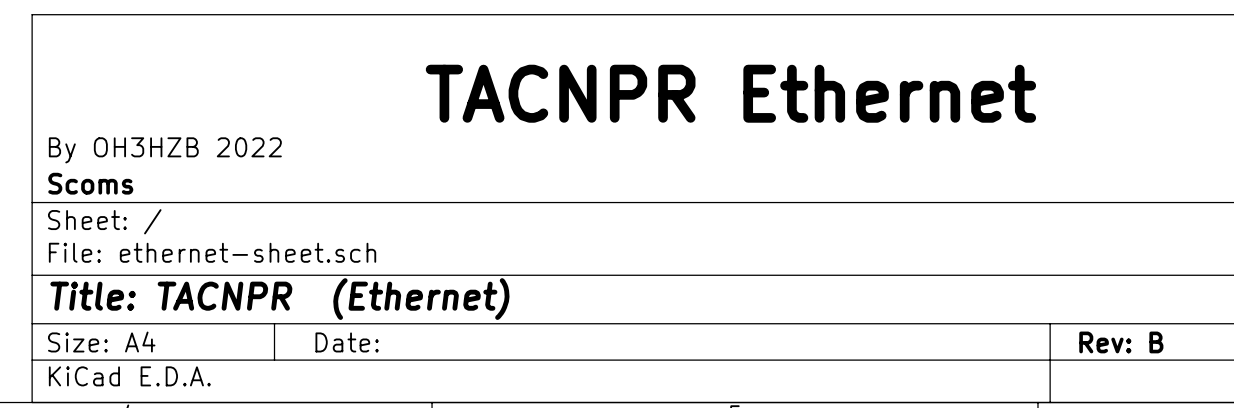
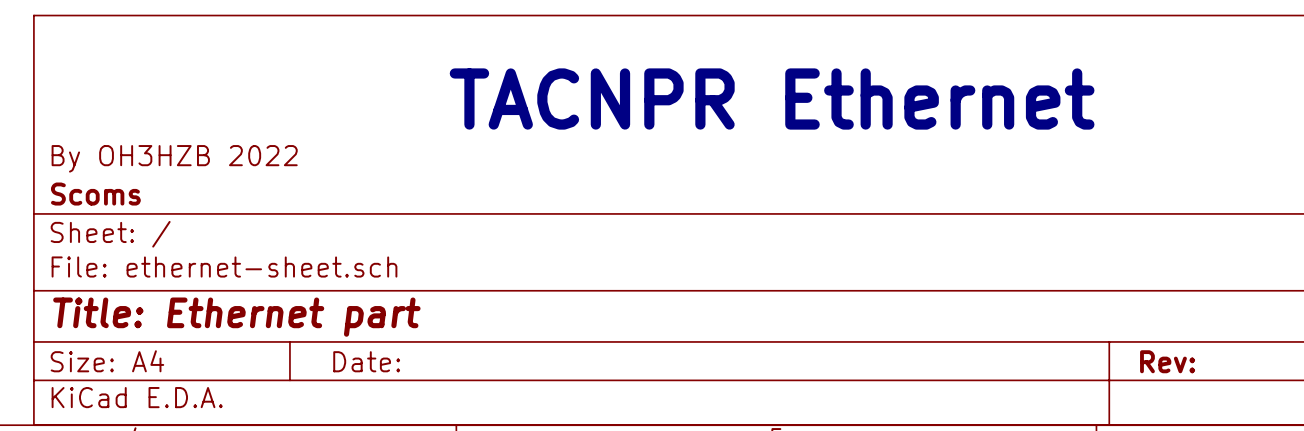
title block: Title: TACNPR (Ethernet) (279, 299) -> Title: Ethernet part (236, 317)
title block: Rev: B (1121, 342) -> Rev: (1167, 361)

